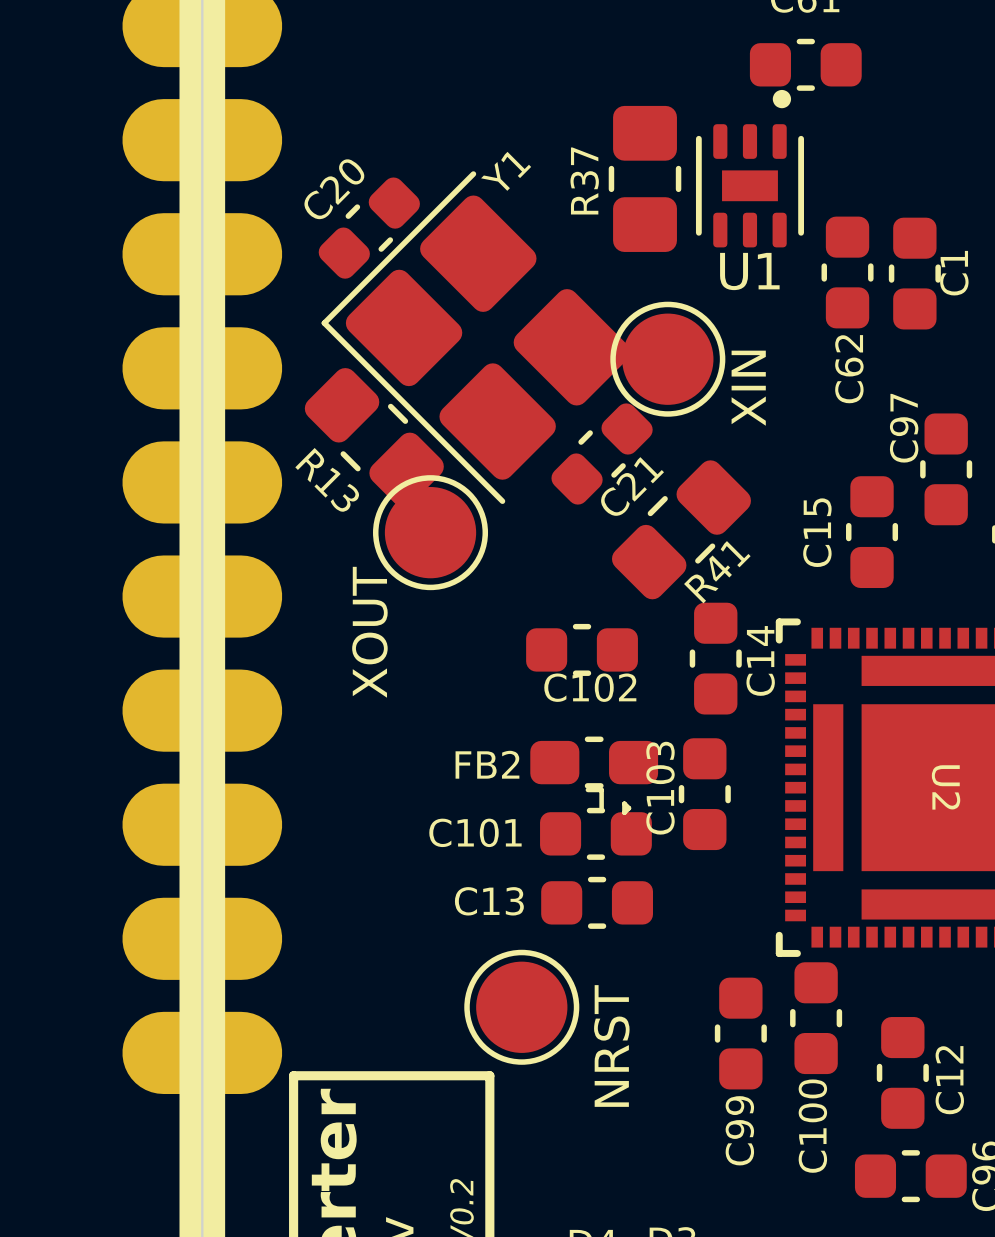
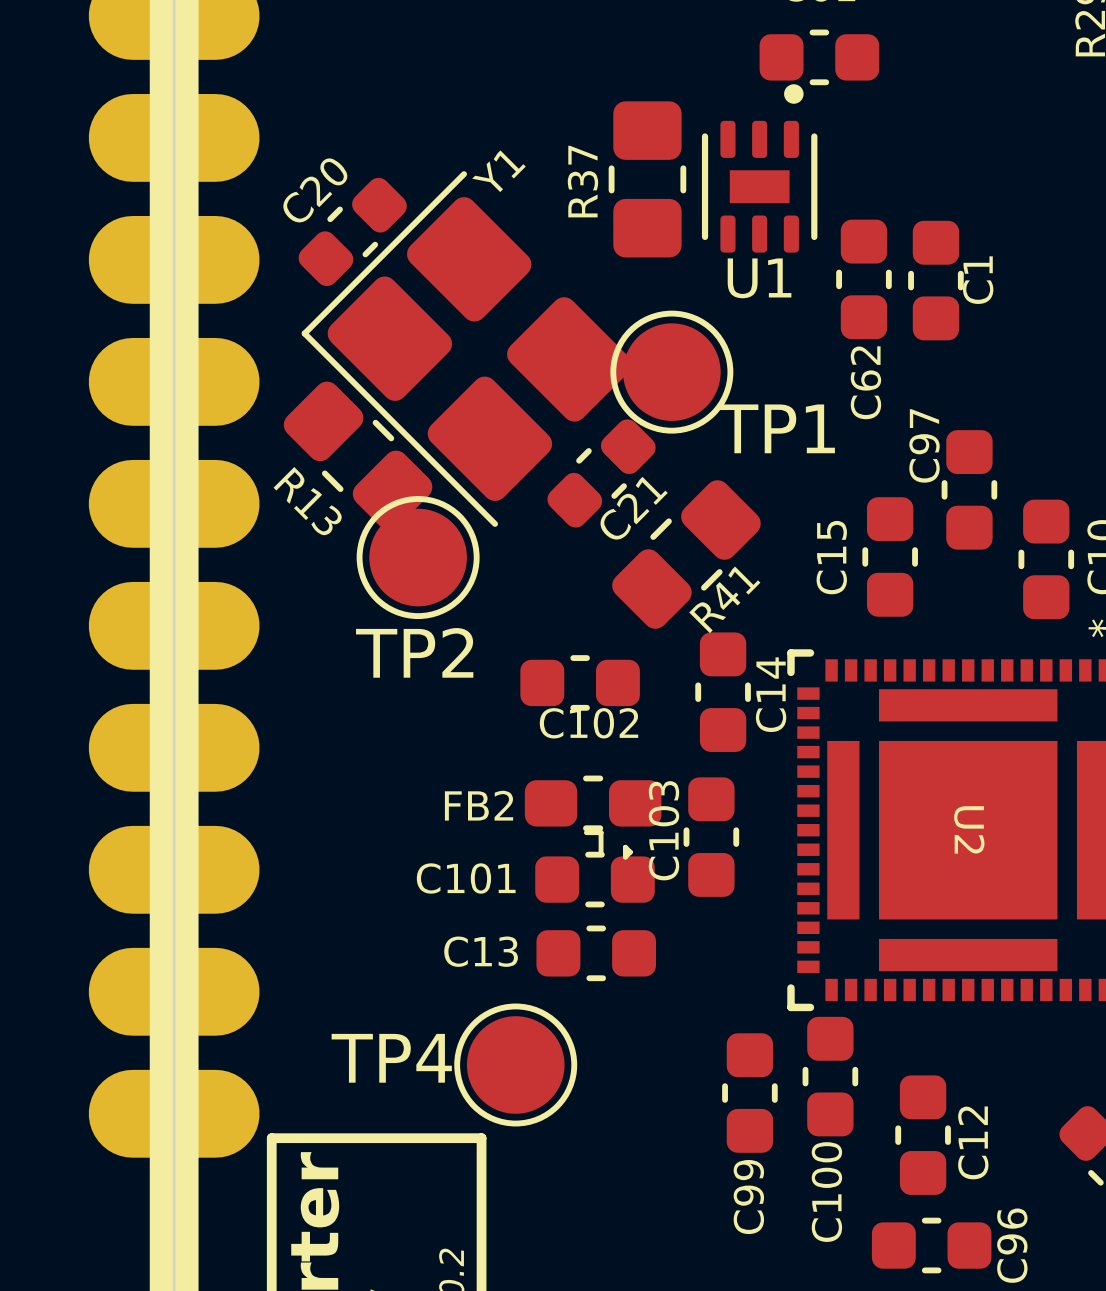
XIN name: XIN (748, 388) -> TP1 (776, 428)
XOUT name: XOUT (369, 632) -> TP2 (414, 652)
NRST name: NRST (611, 1045) -> TP4 (391, 1058)

